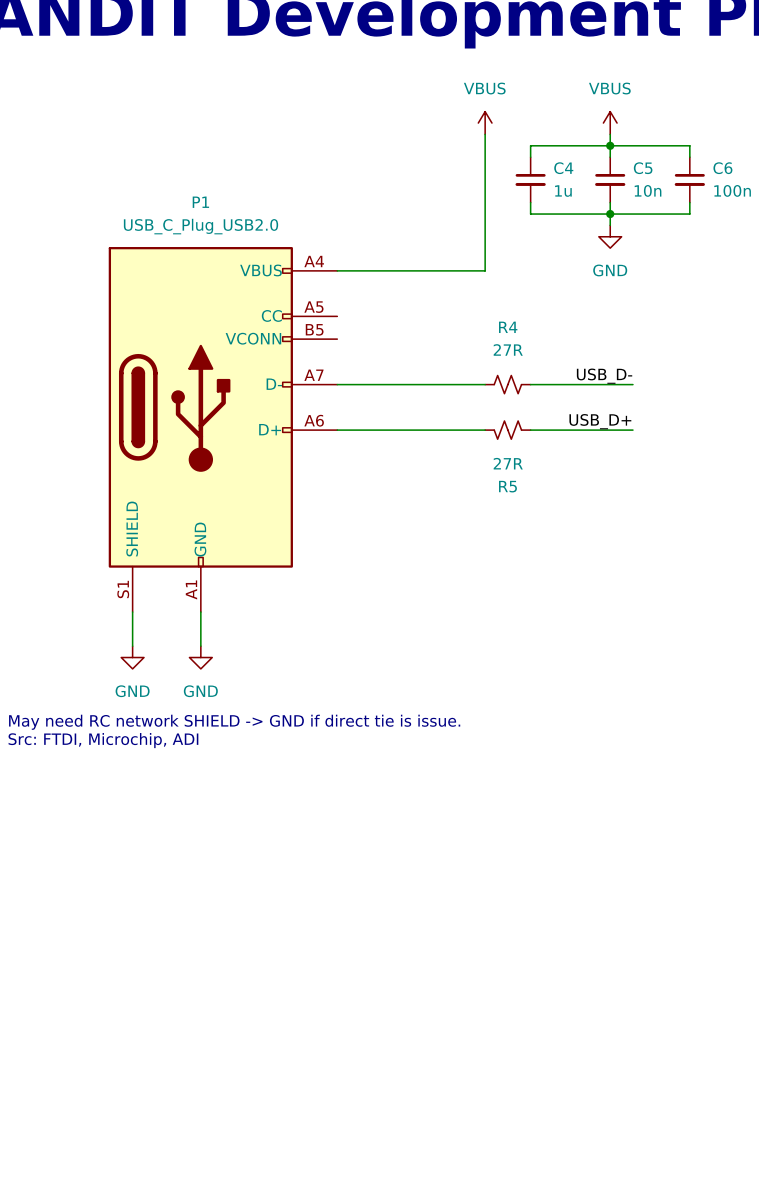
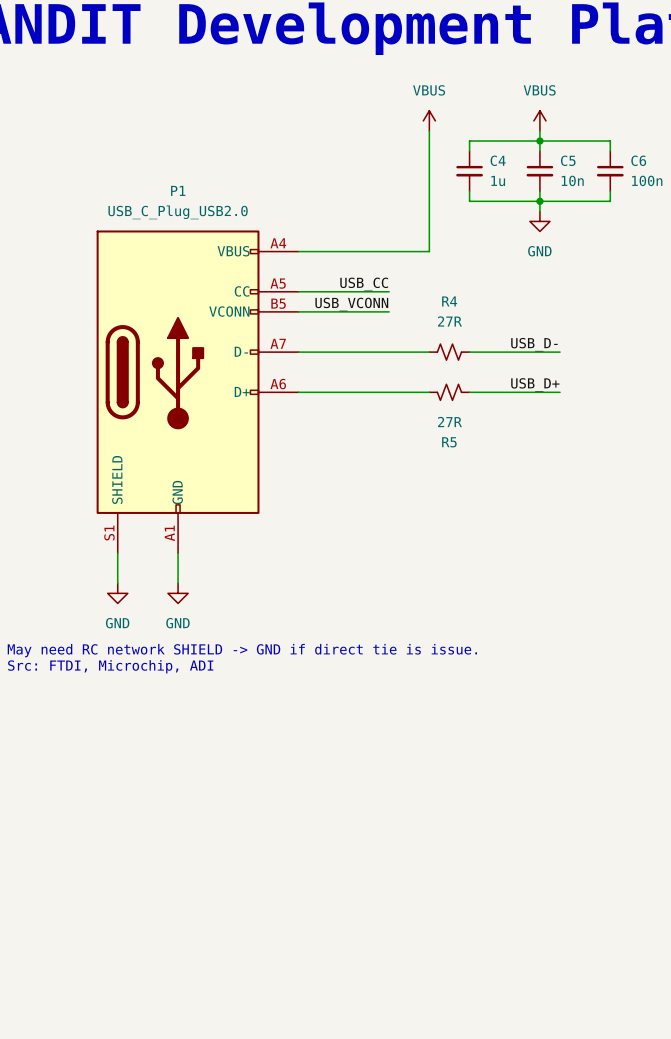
label: none -> USB_CC (364, 284)
wire: none -> (298, 291) (389, 291)
label: none -> USB_VCONN (351, 304)
wire: none -> (298, 311) (389, 311)

